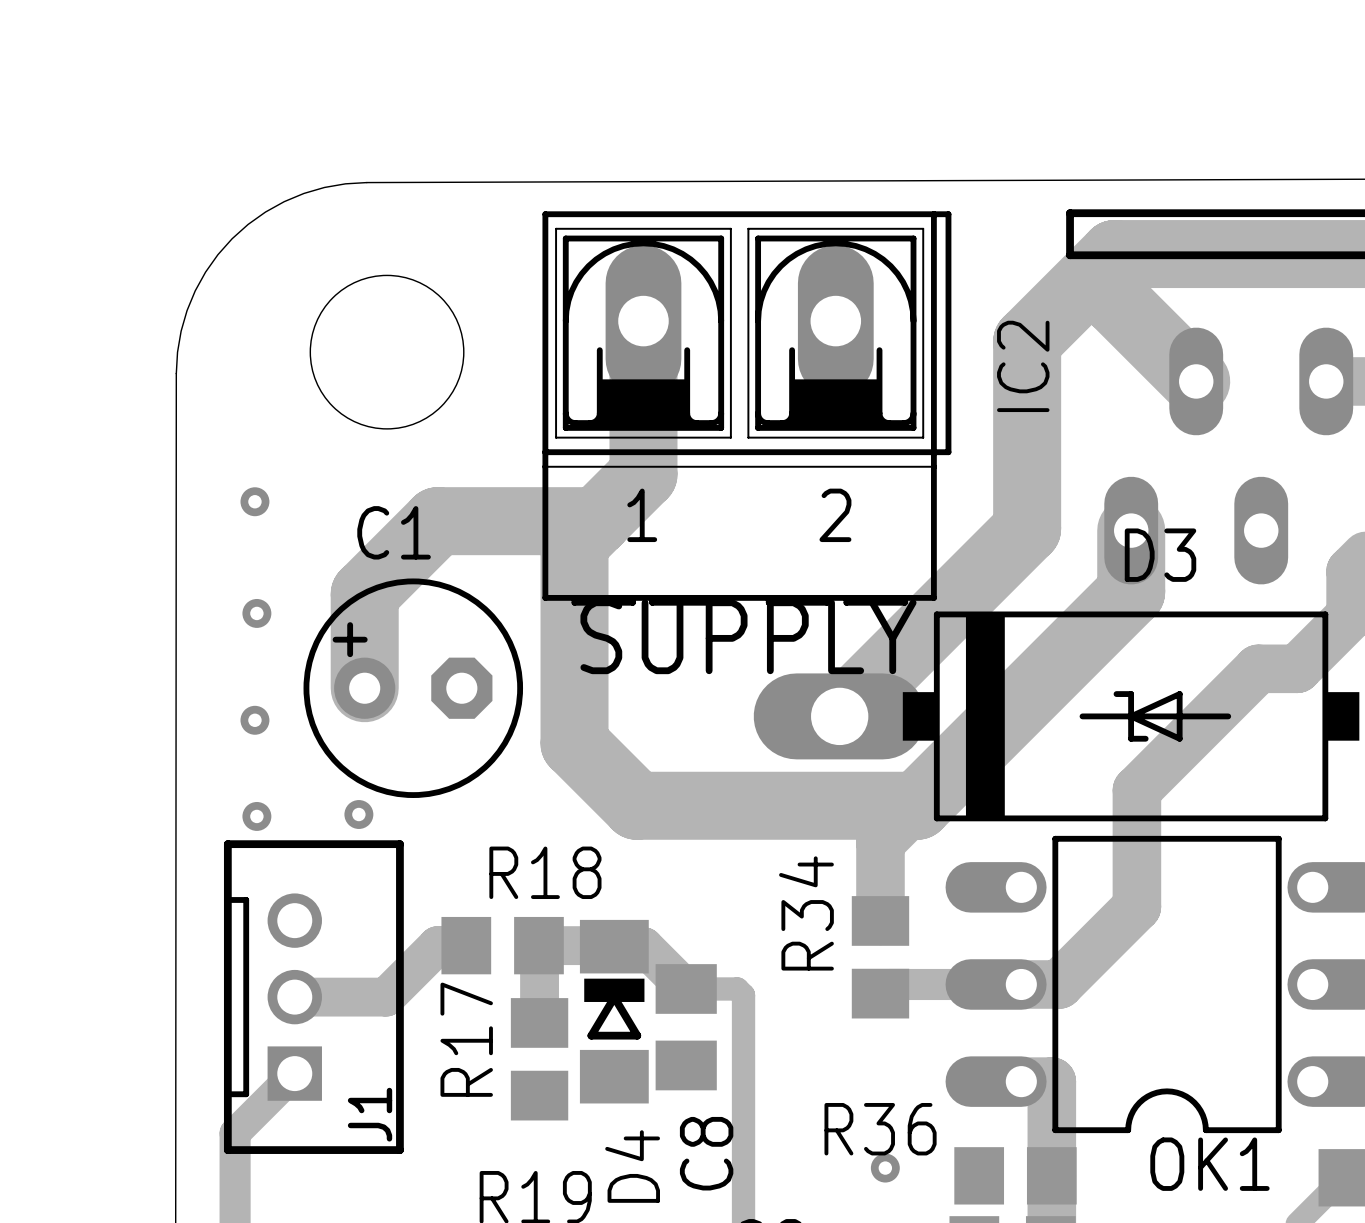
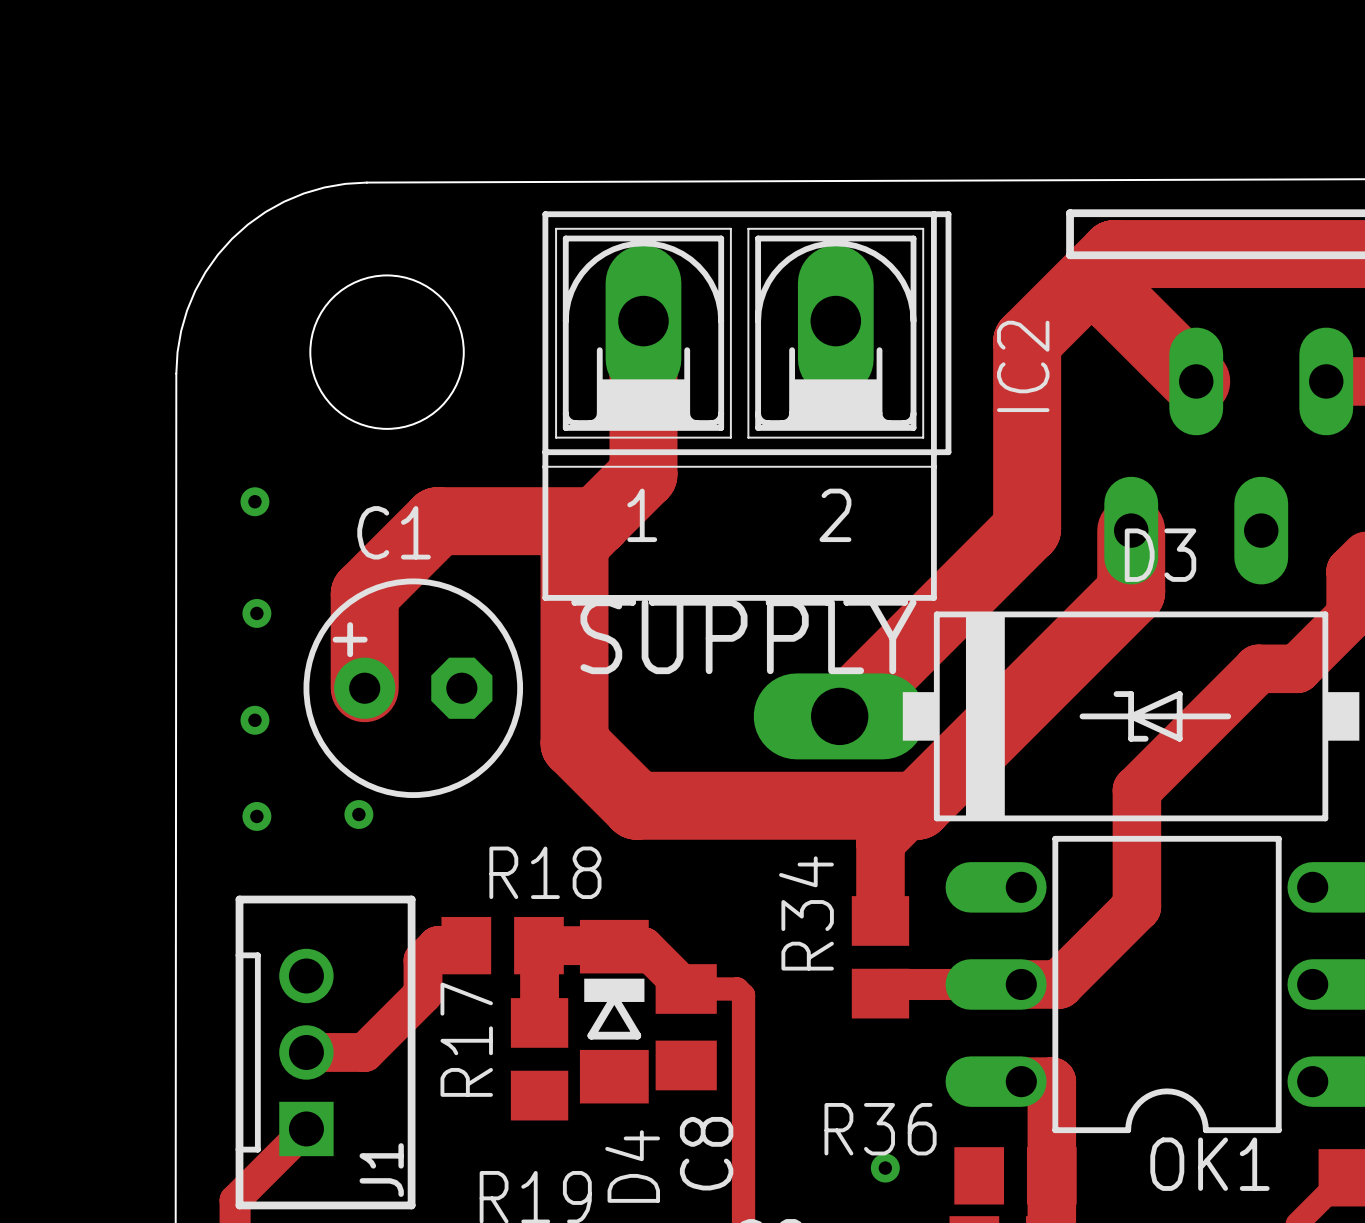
track: (422, 960) (386, 997) (294, 997) -> (422, 960) (422, 994) (364, 1052) (306, 1052)
J1 position: (313, 997) -> (325, 1052)
track: (294, 1073) (235, 1133) (235, 1200) -> (306, 1128) (235, 1200)

